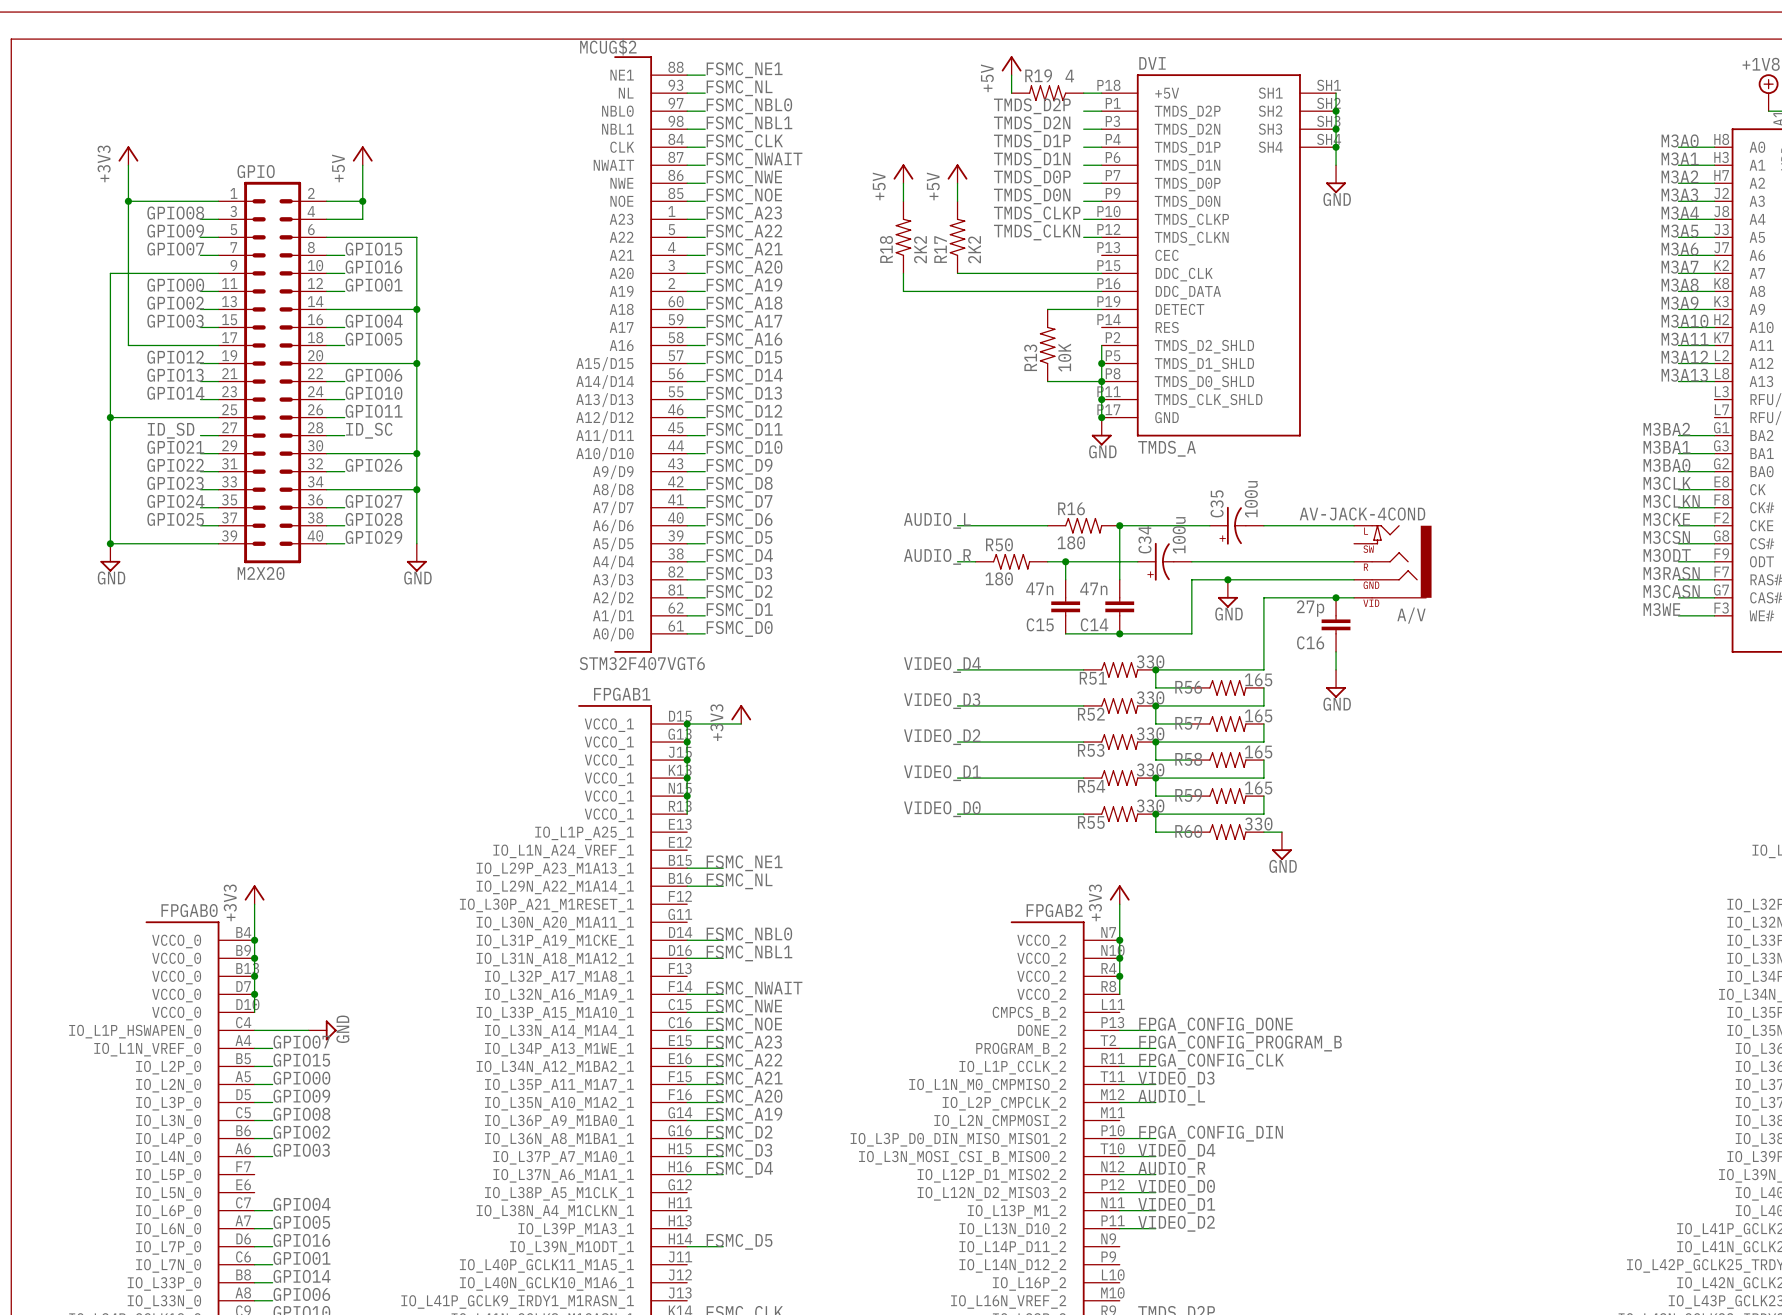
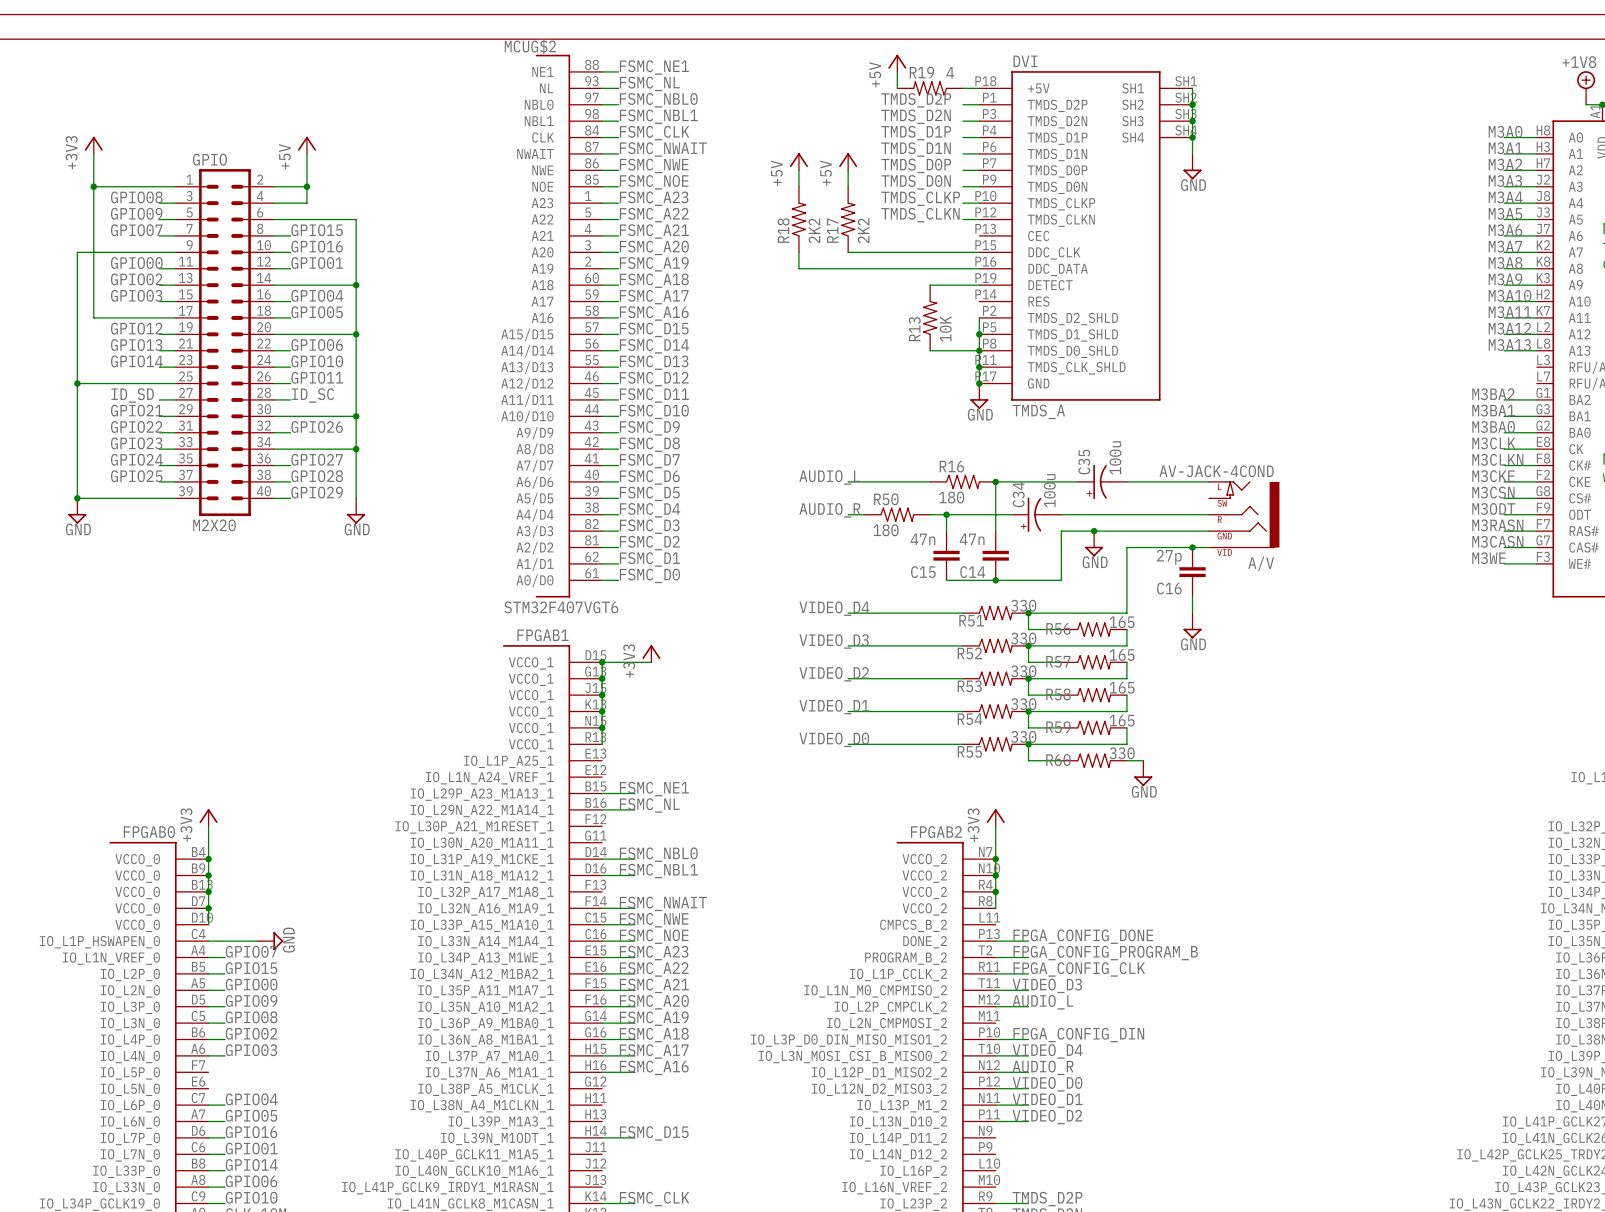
label: FSMC_D2 (739, 1133) -> FSMC_A18 (654, 1035)
label: FSMC_D3 (739, 1151) -> FSMC_A17 (654, 1051)
label: FSMC_D4 (739, 1169) -> FSMC_A16 (654, 1067)
label: FSMC_D5 (739, 1241) -> FSMC_D15 (654, 1133)

